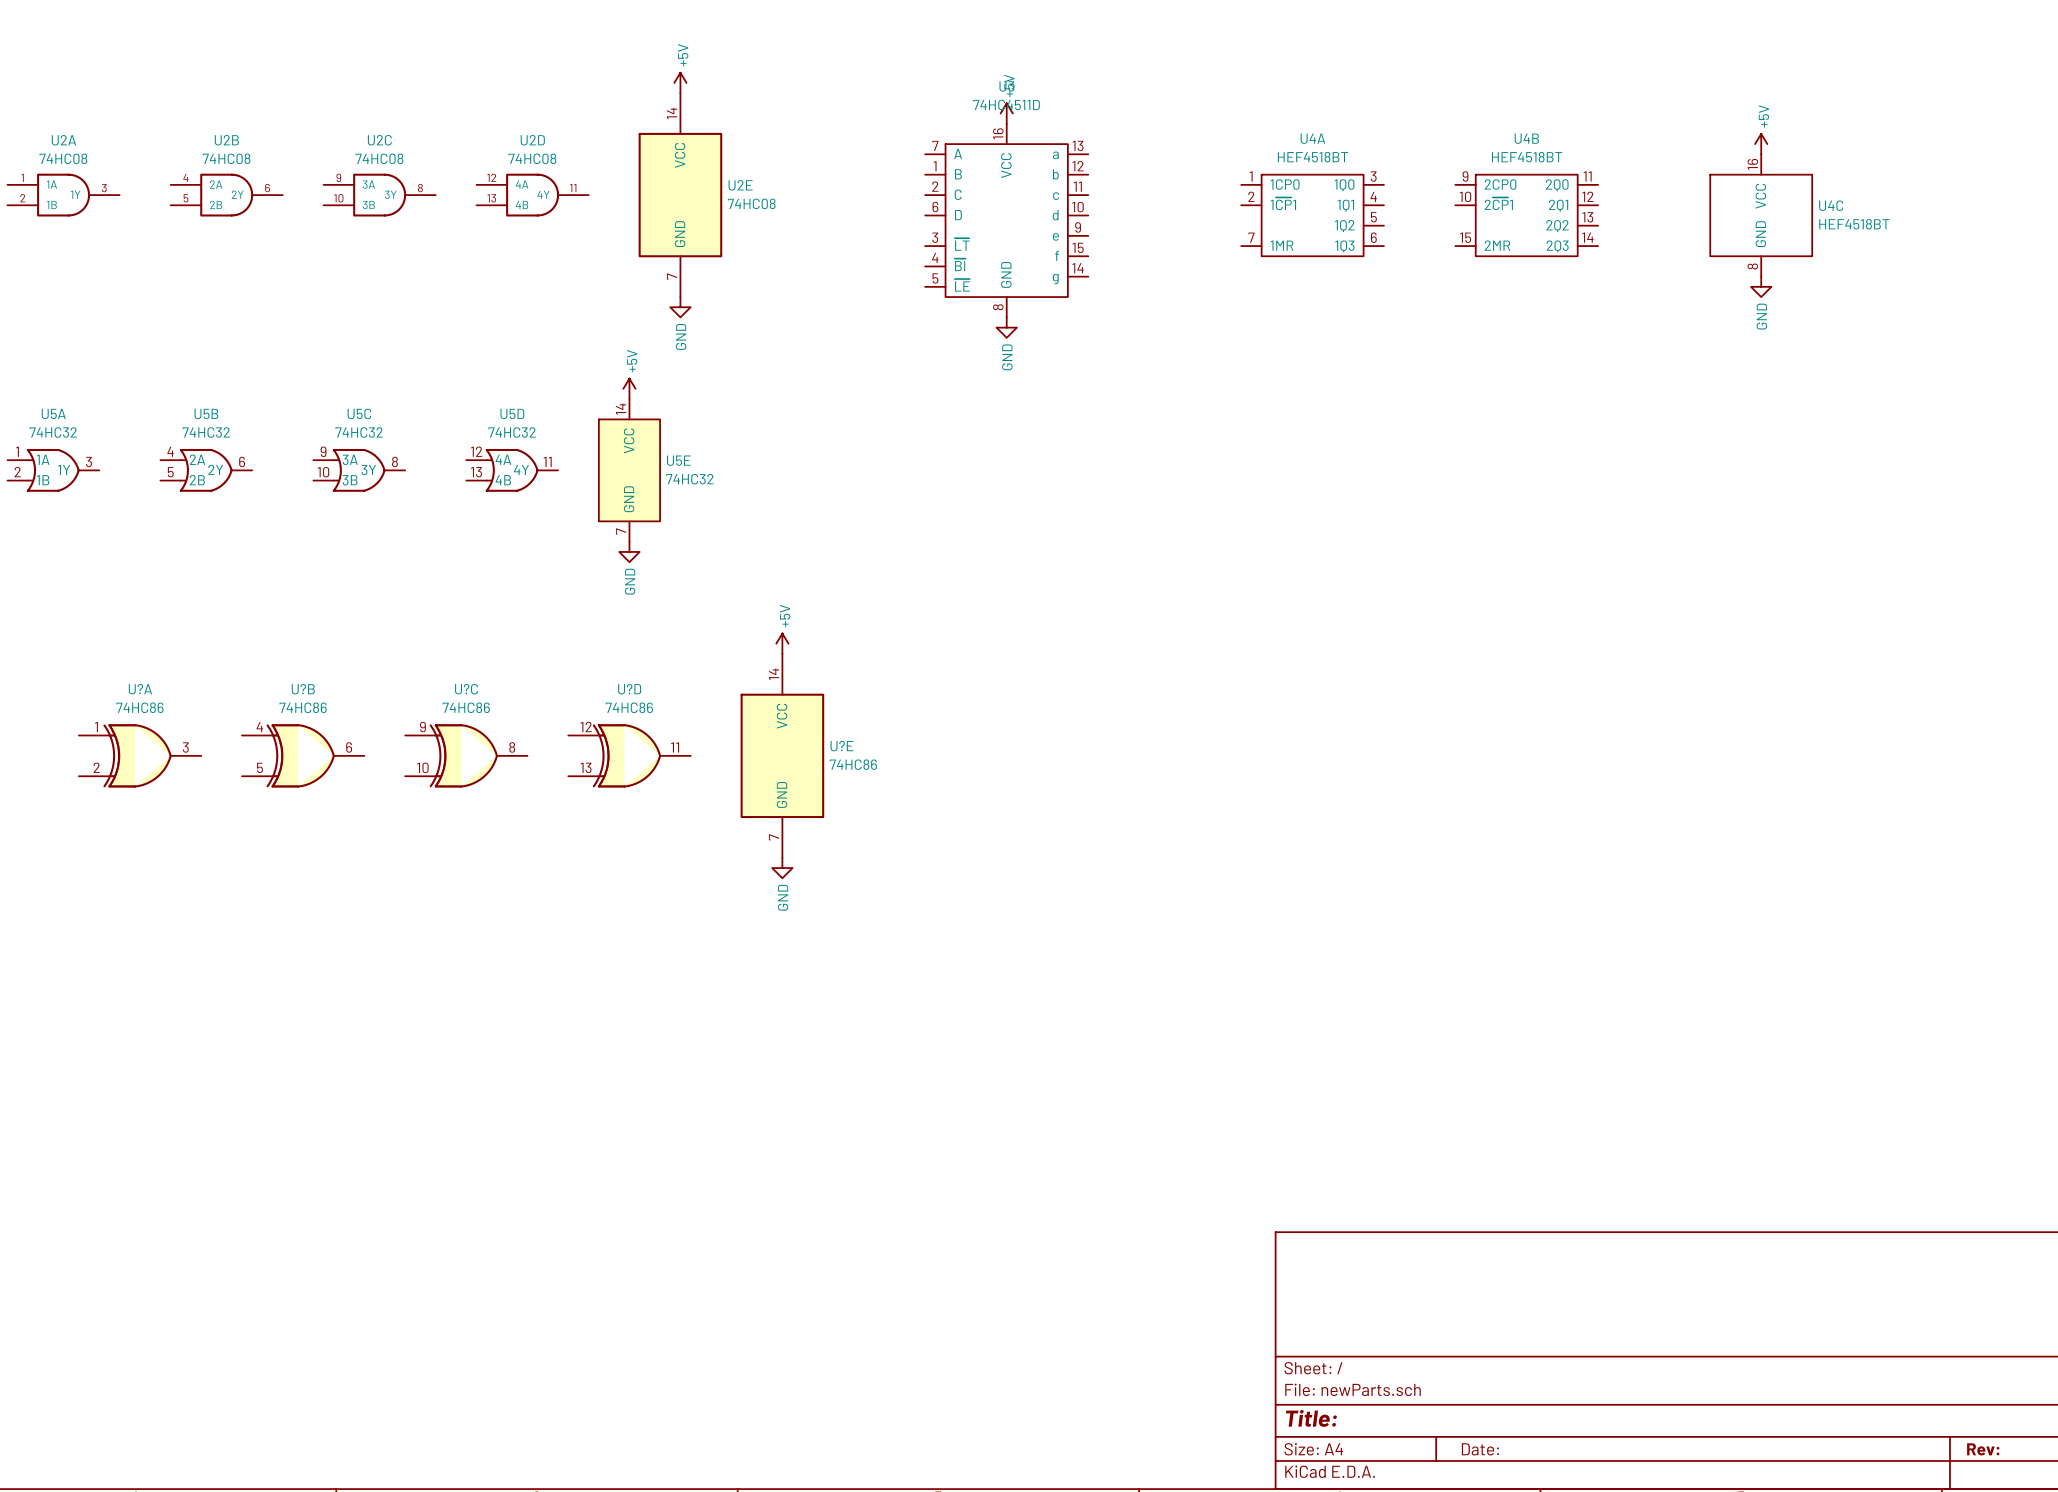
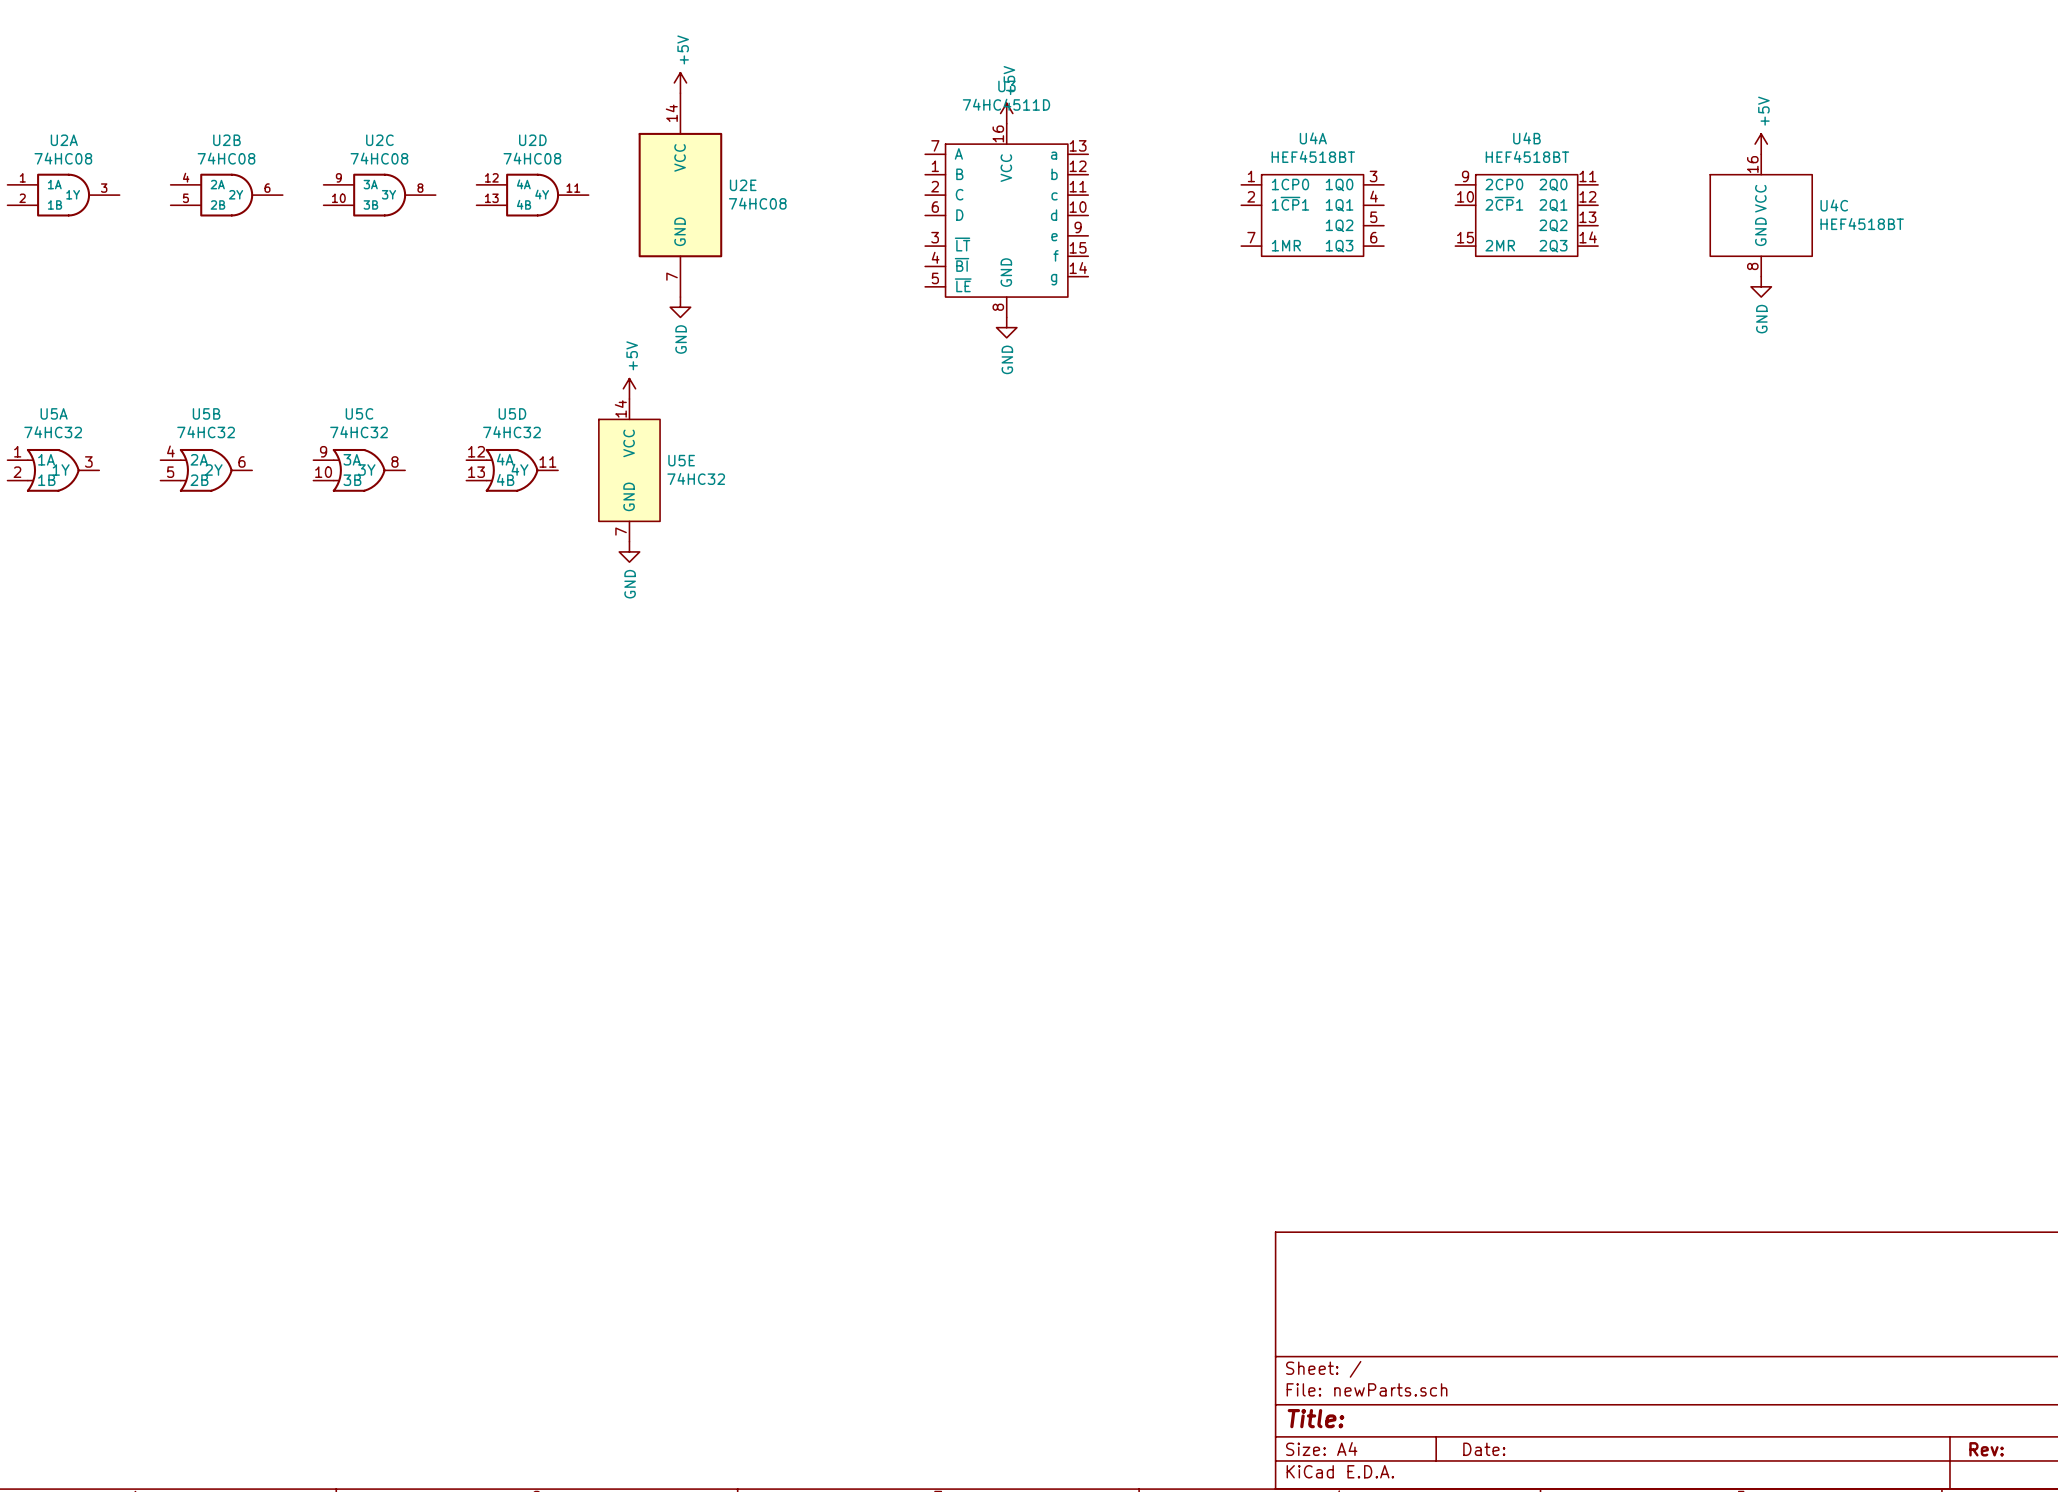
power symbol: +5V (782, 643) -> none
U?A: 74HC86 (140, 755) -> none
U?B: 74HC86 (303, 755) -> none
U?C: 74HC86 (466, 755) -> none
U?D: 74HC86 (629, 755) -> none
U?E: 74HC86 (782, 755) -> none
power symbol: GND (782, 868) -> none

